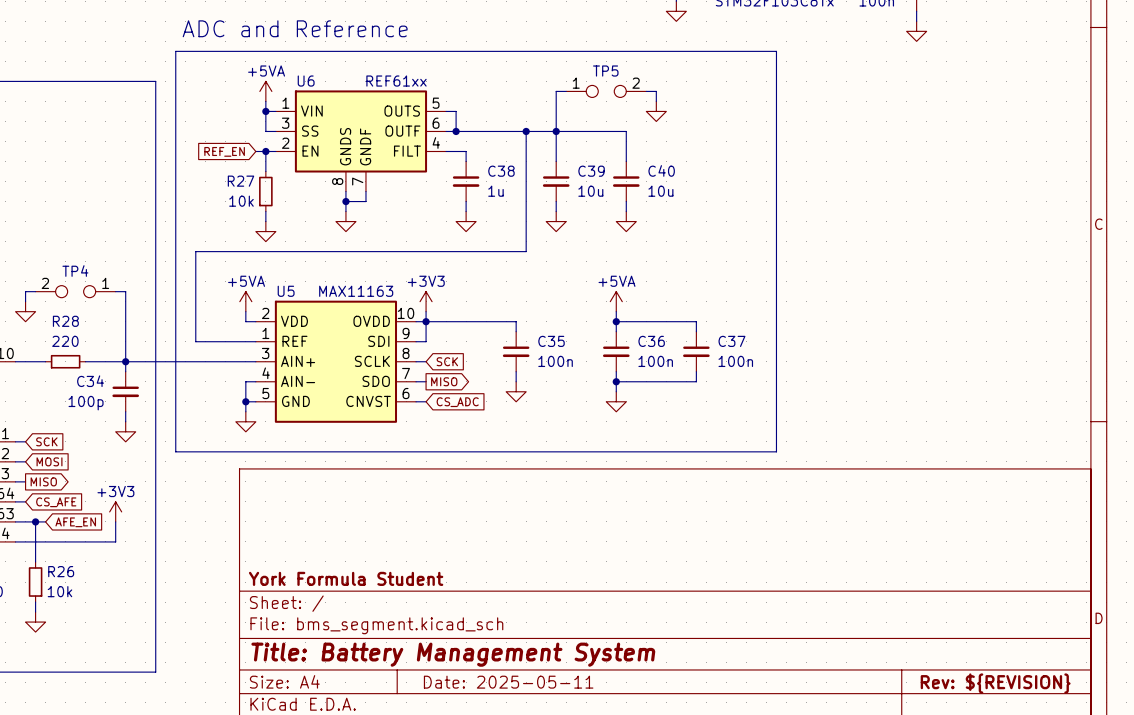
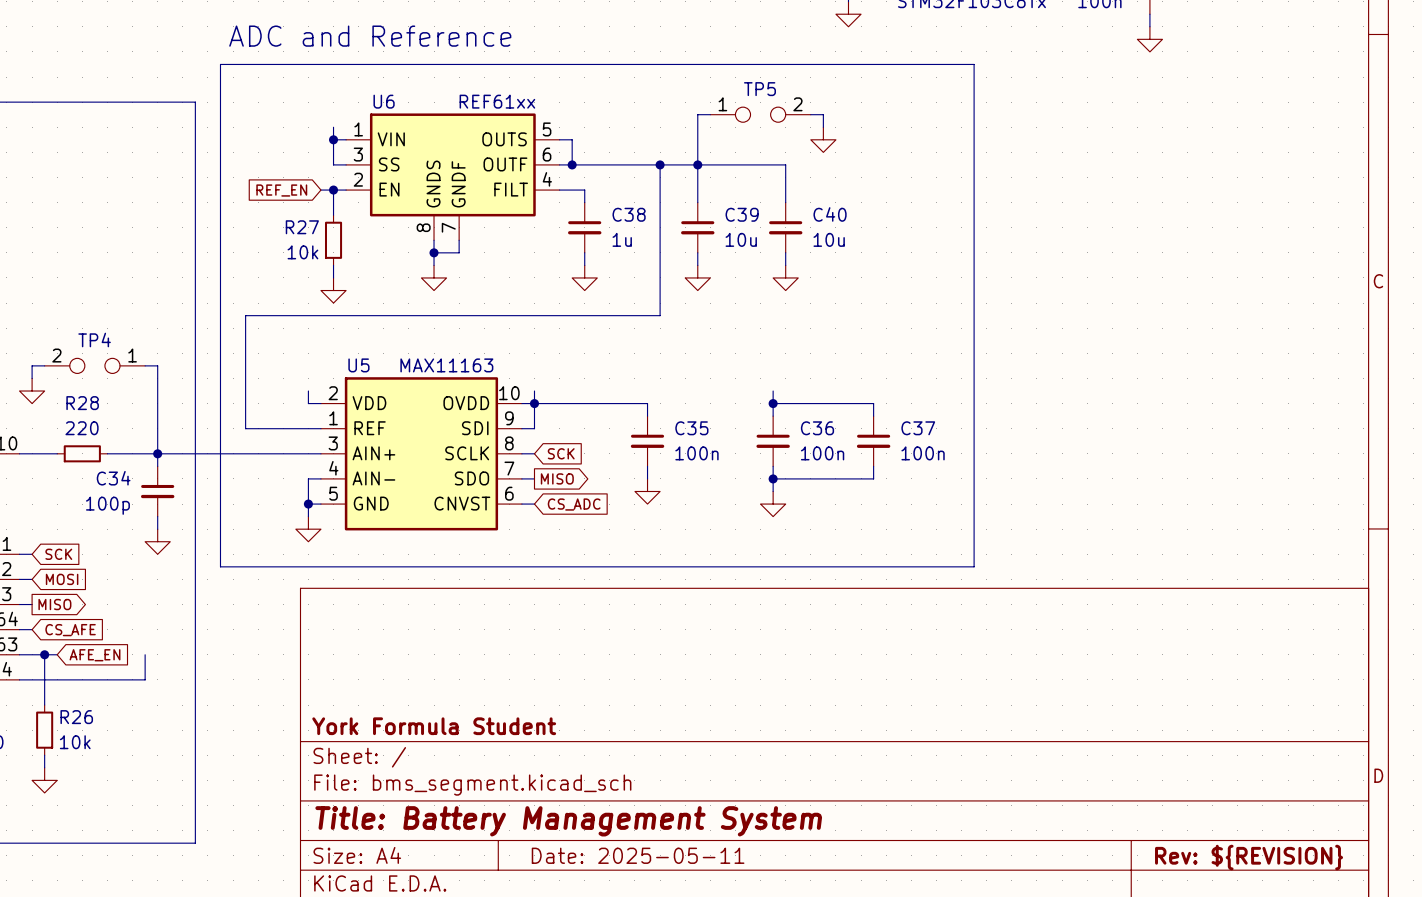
power symbol: +5VA (265, 91) -> none
power symbol: +5VA (245, 301) -> none
power symbol: +3V3 (426, 301) -> none
power symbol: +5VA (616, 301) -> none
power symbol: +3V3 (115, 511) -> none

